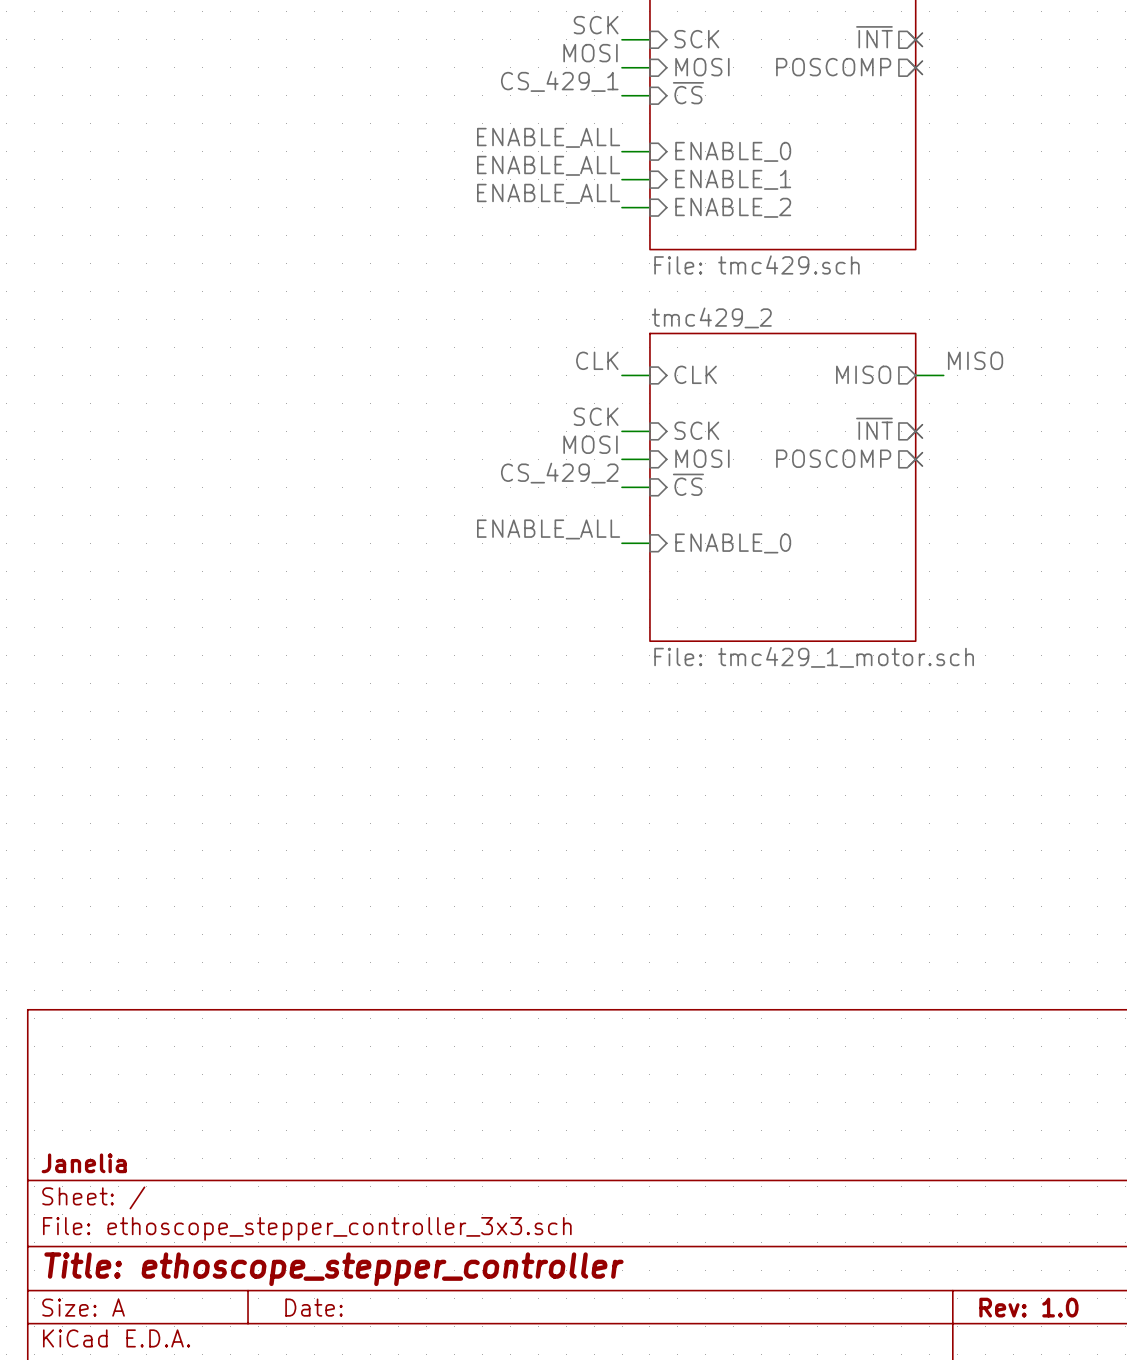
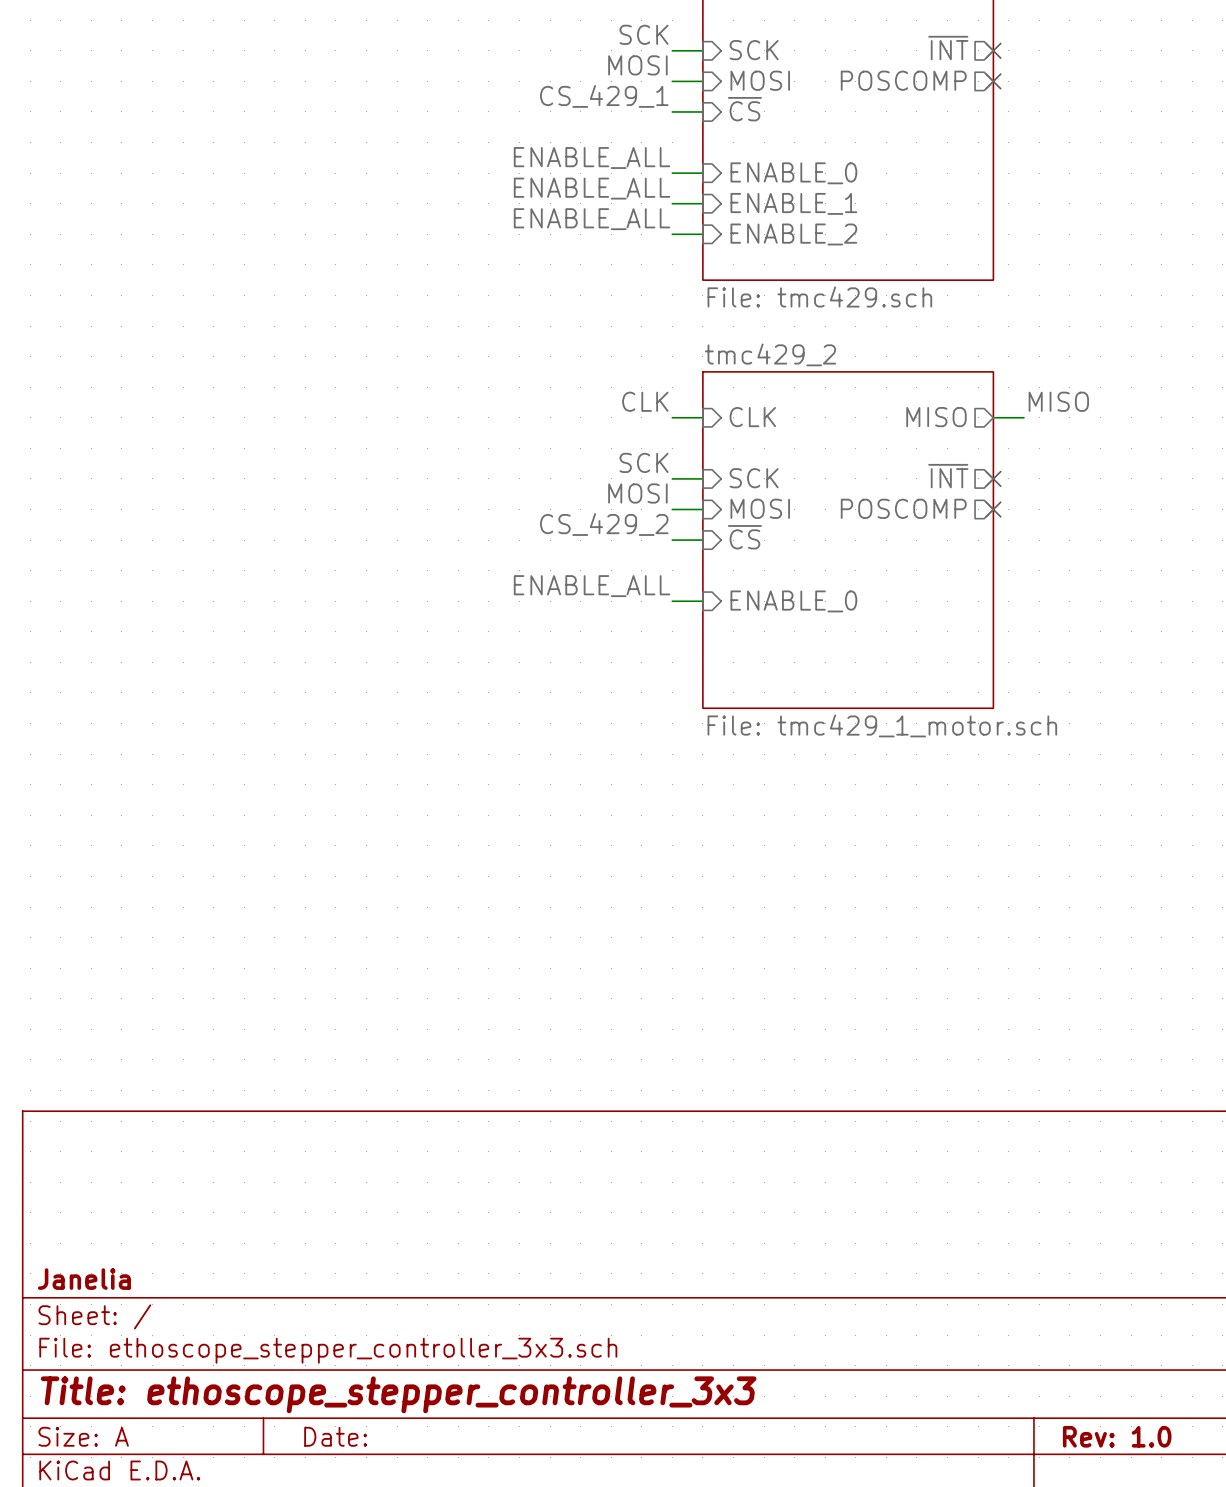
title block: Title: ethoscope_stepper_controller (333, 1269) -> Title: ethoscope_stepper_controller_3x3 (398, 1394)

